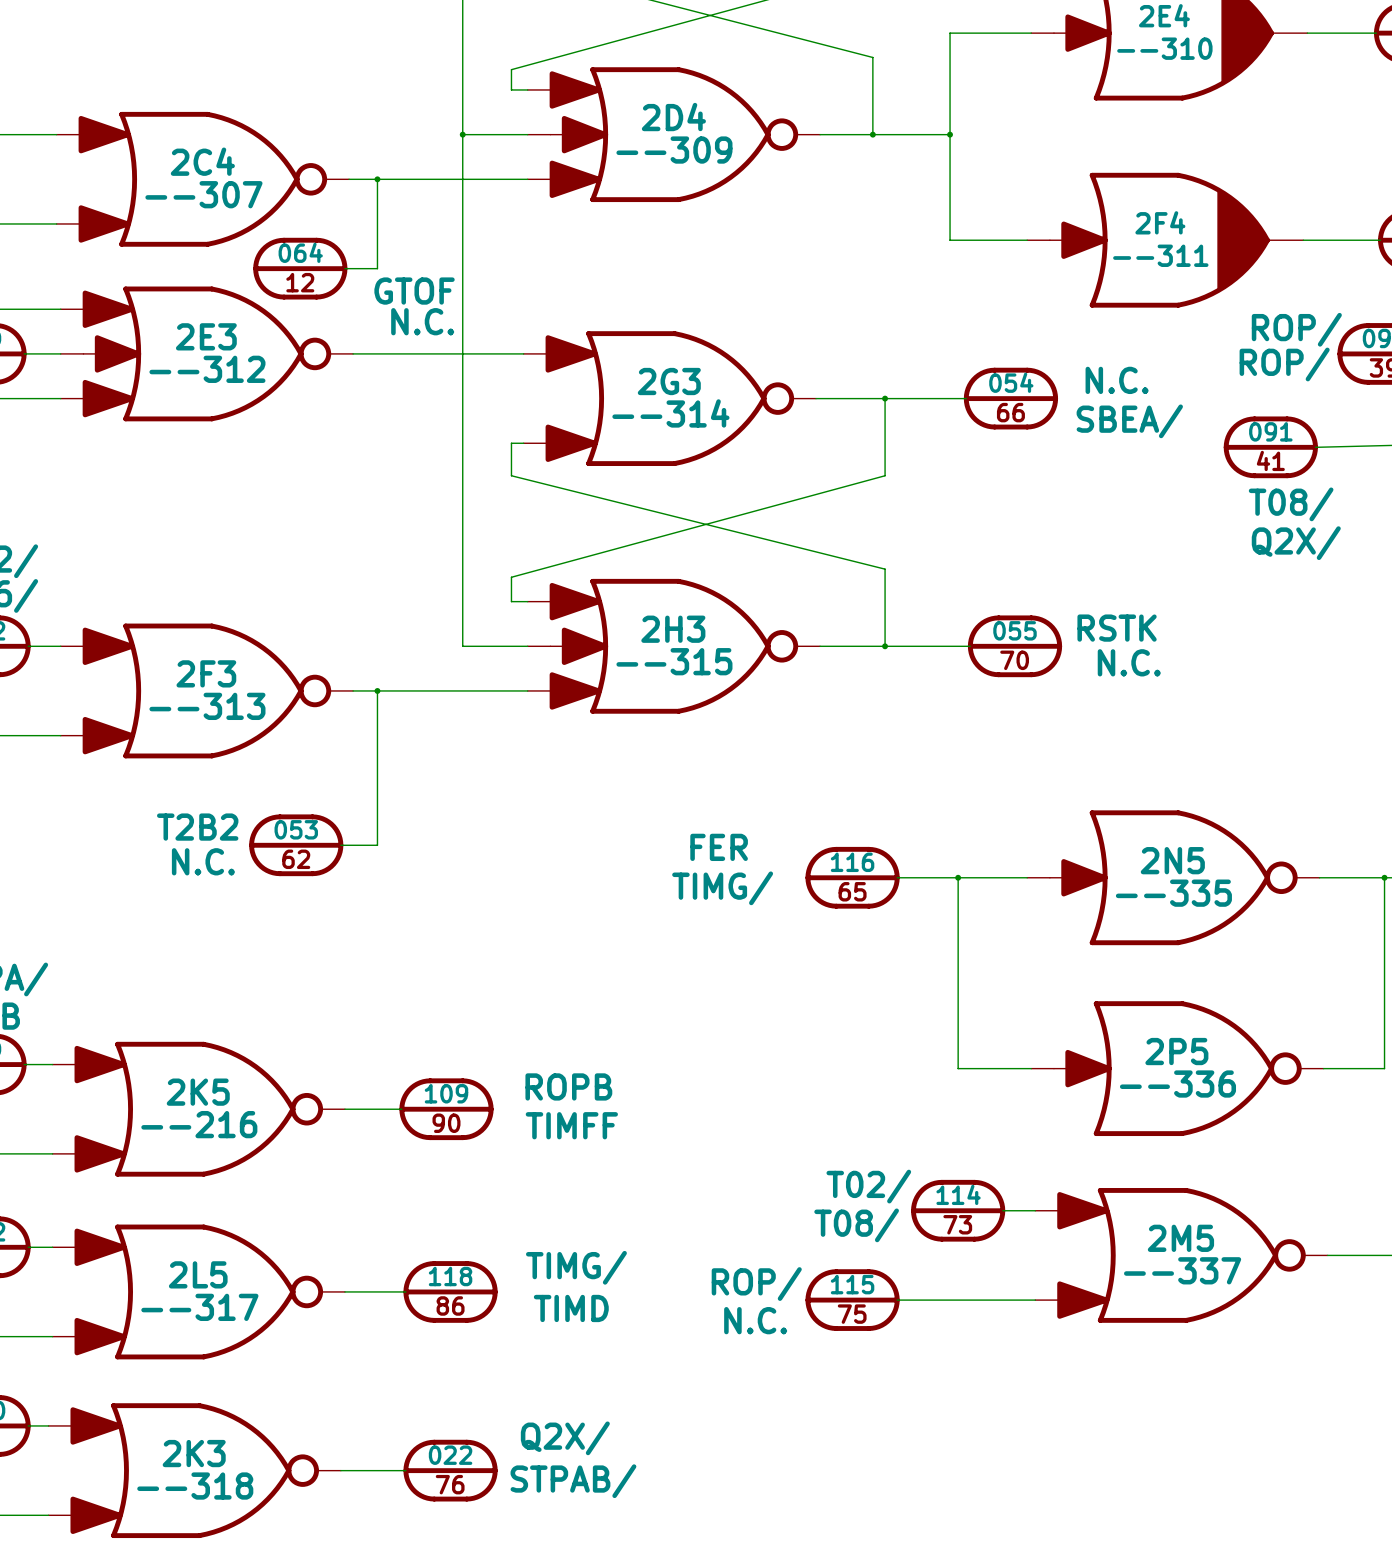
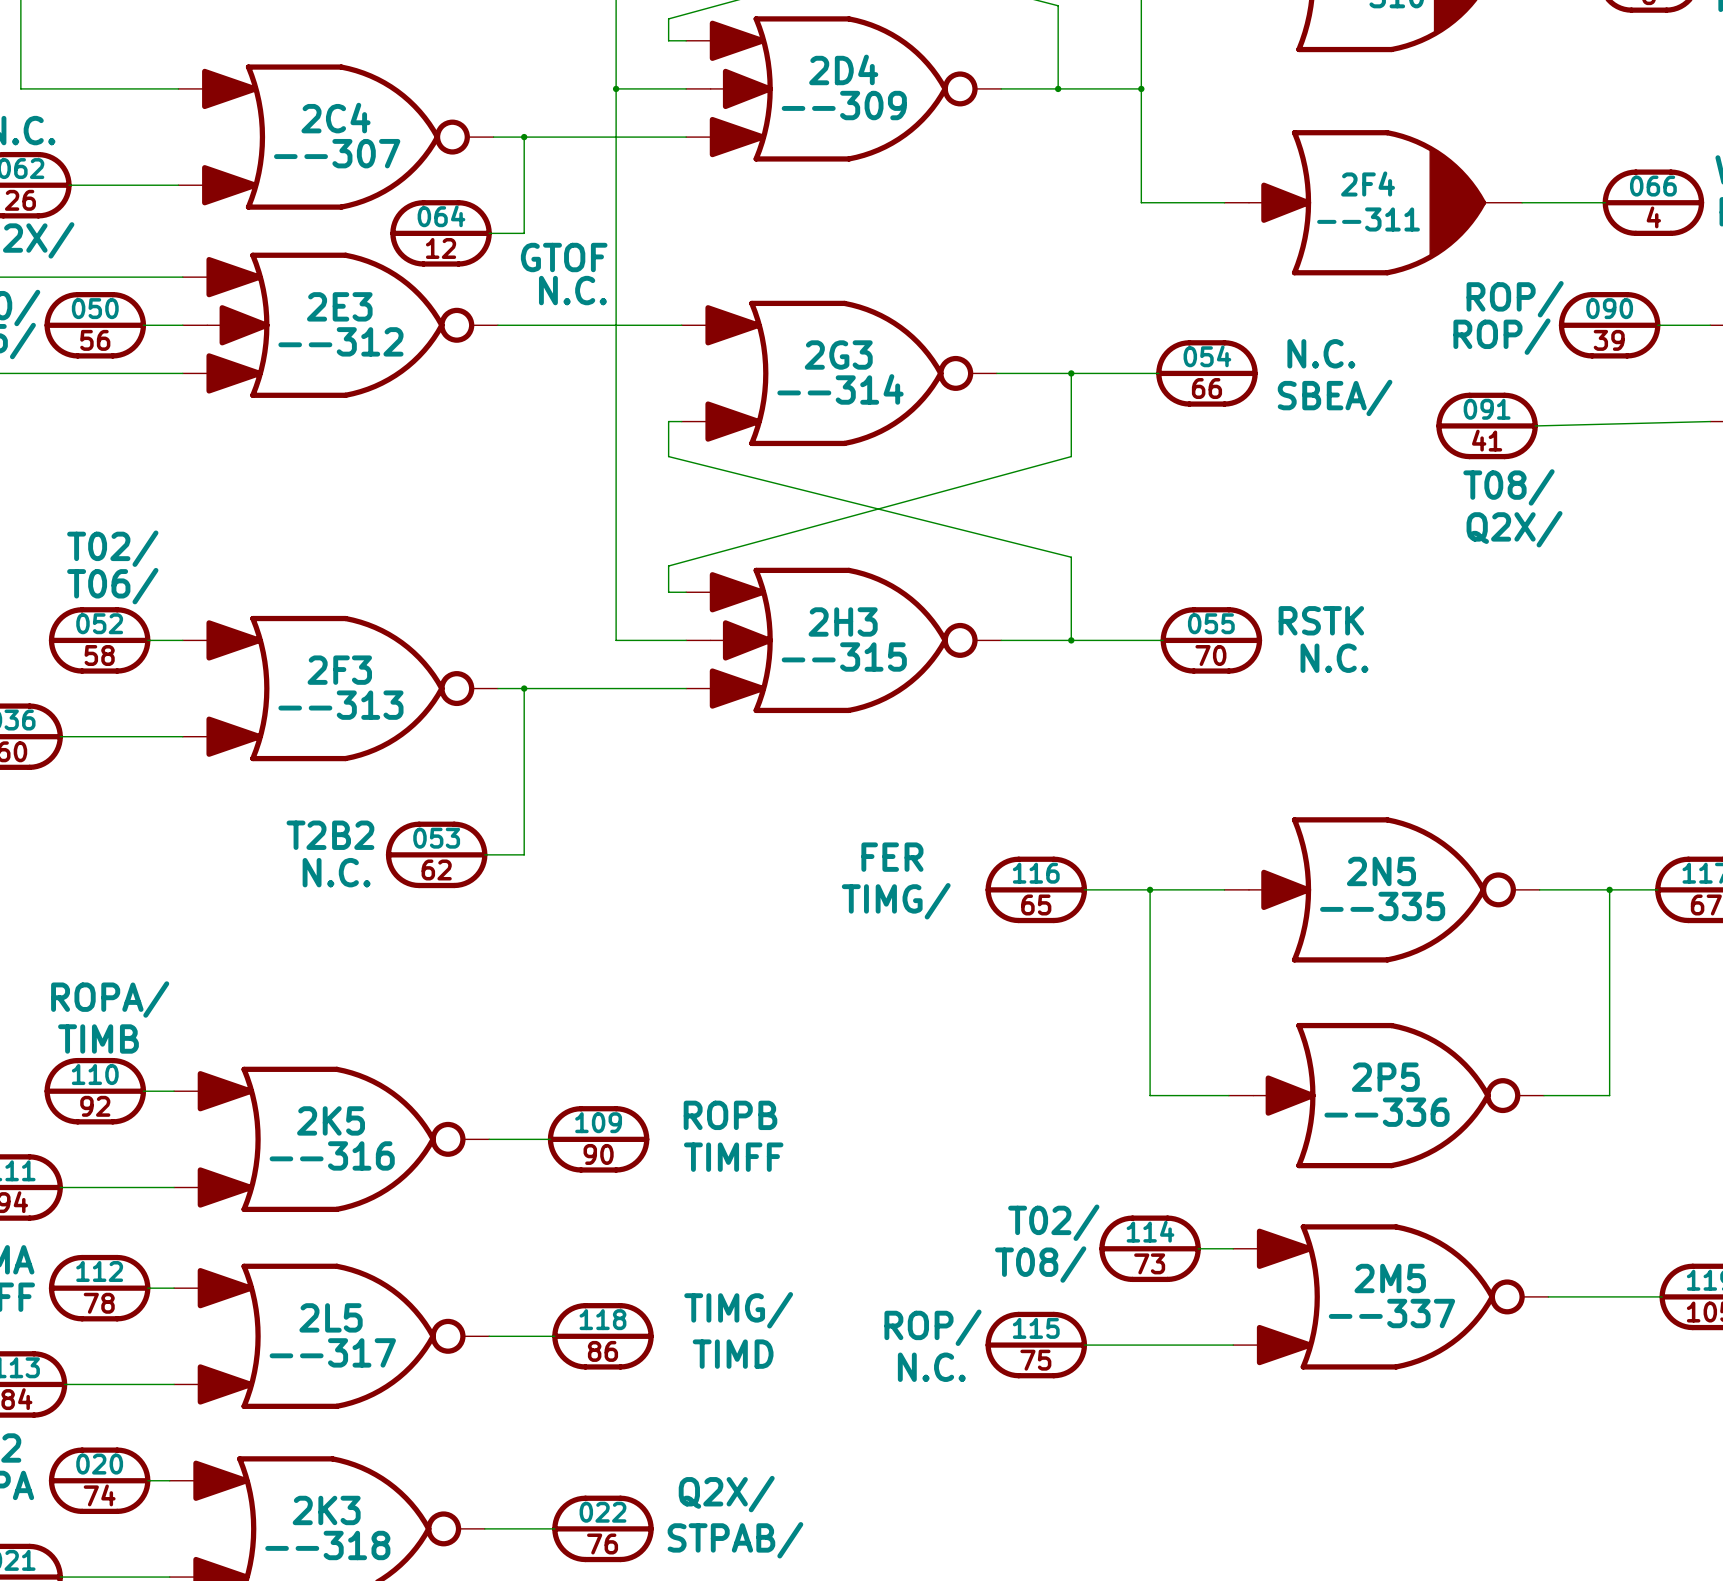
part text: --216 (199, 1124) -> --316 (332, 1155)

